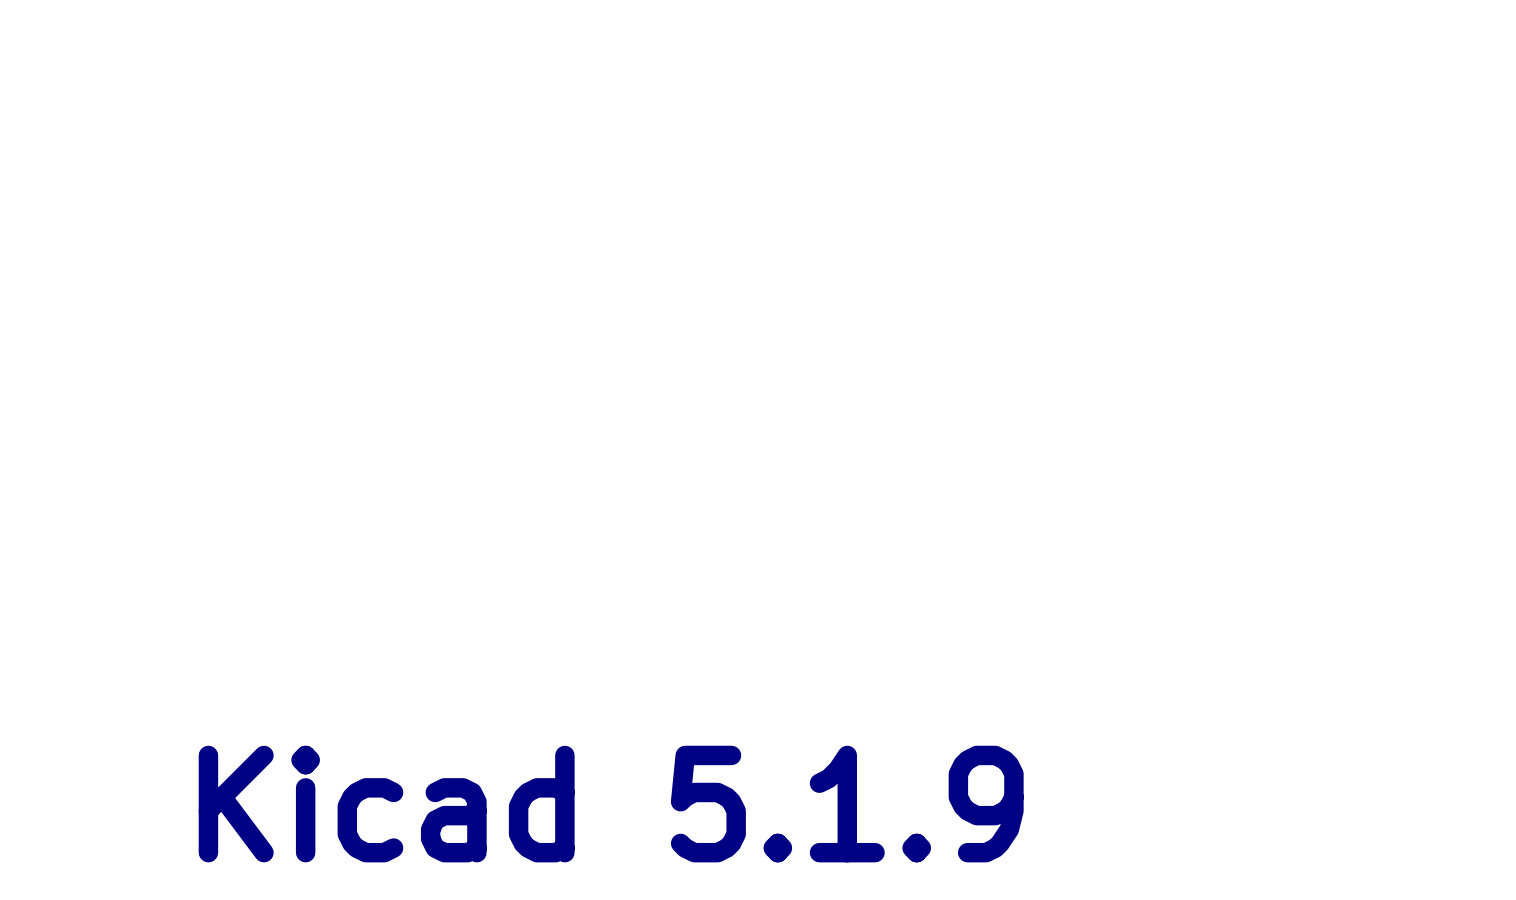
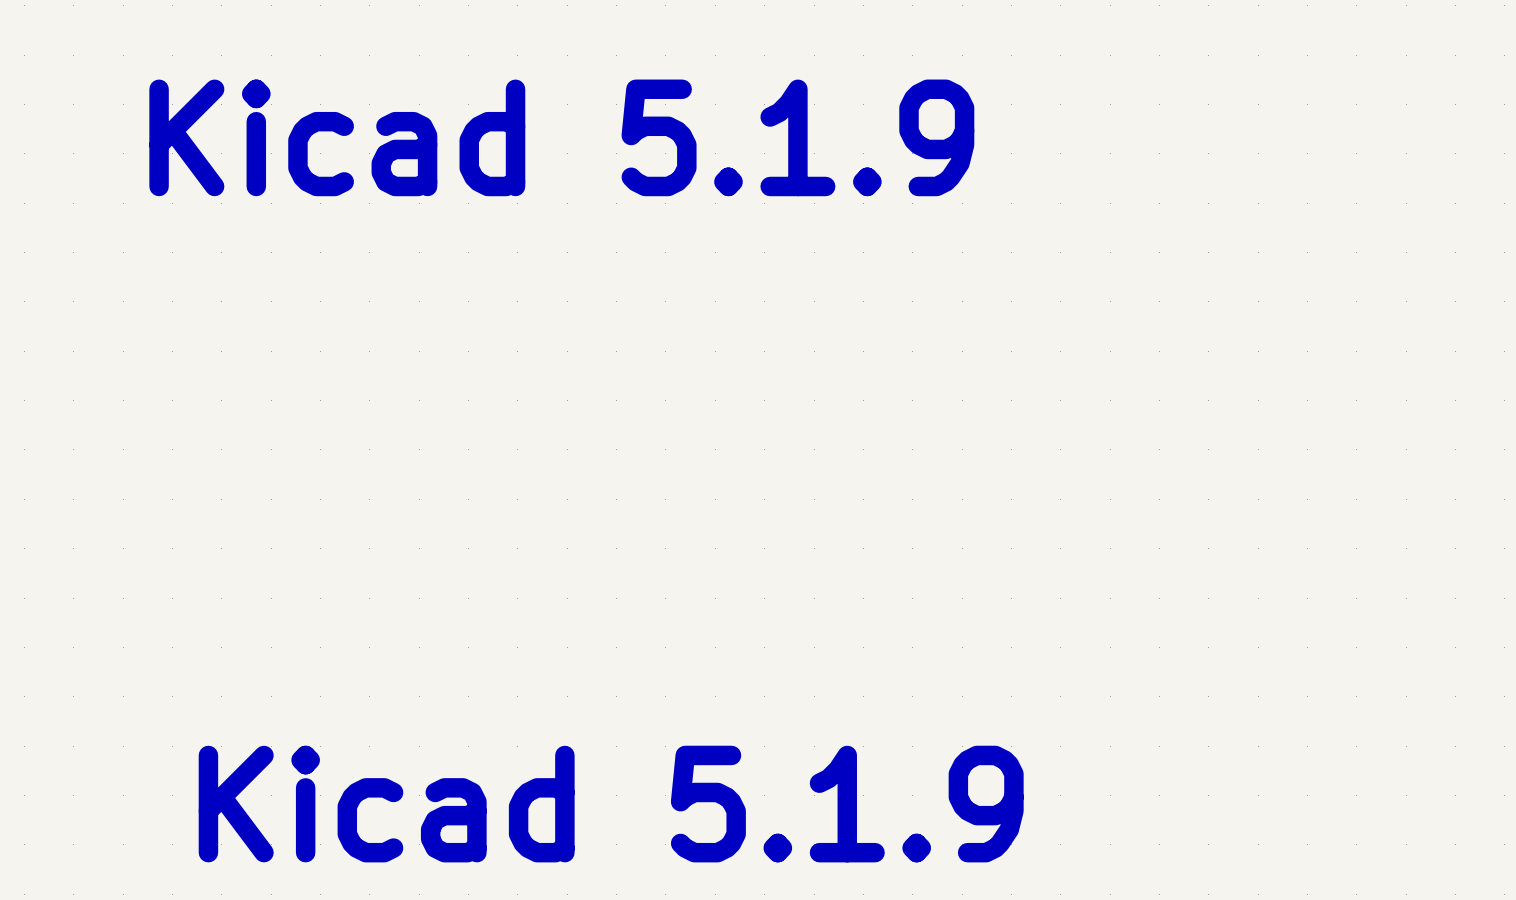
text: none -> Kicad 5.1.9 (561, 137)

